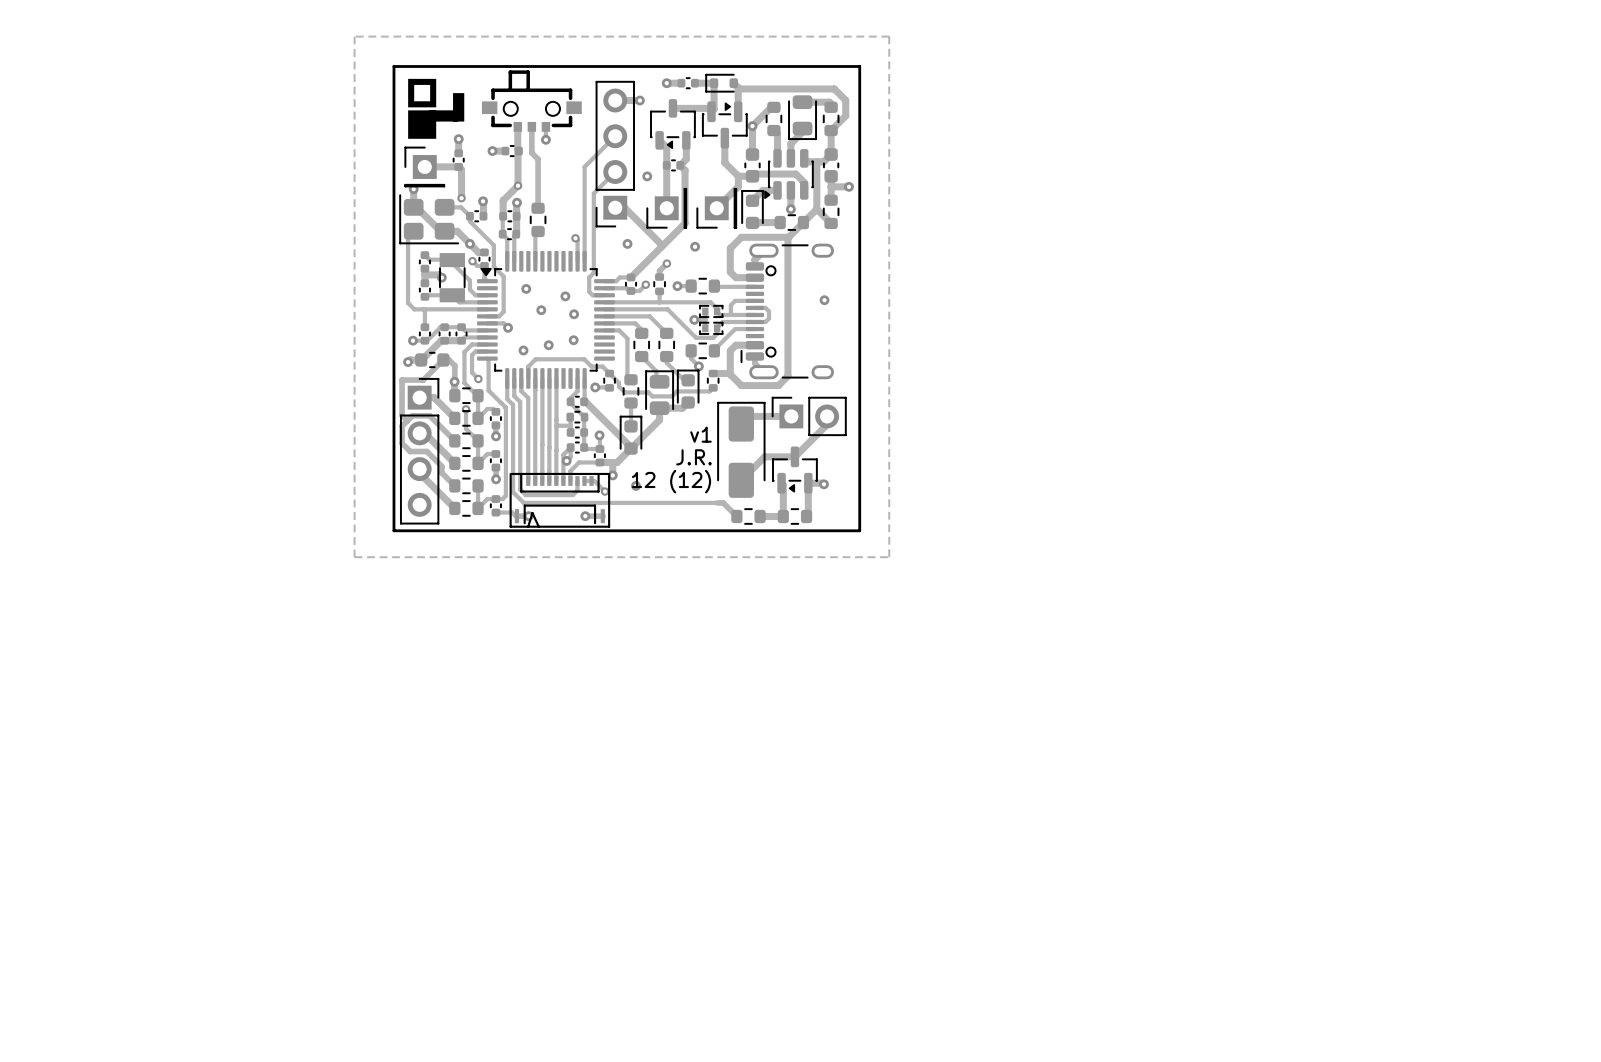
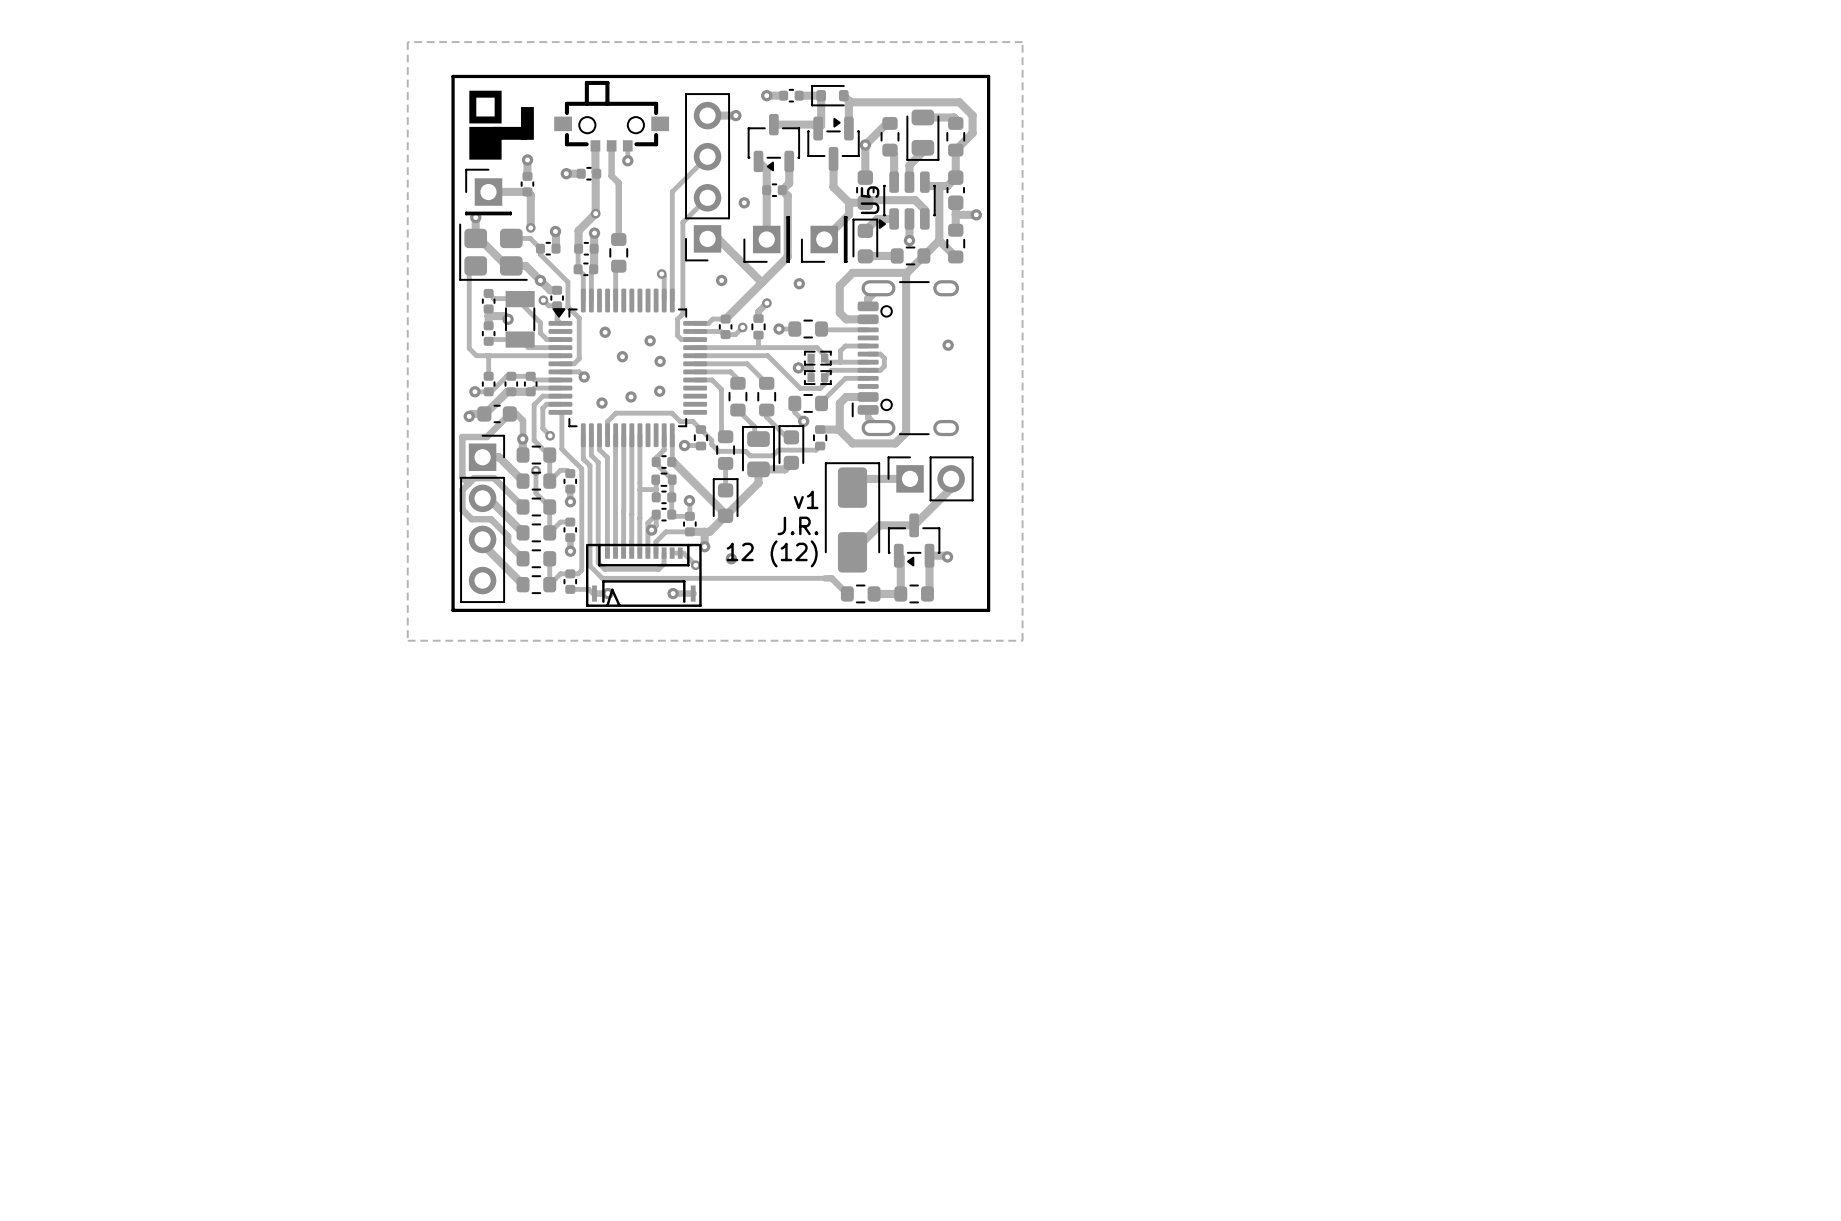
U5 name: none -> U5 (870, 200)

